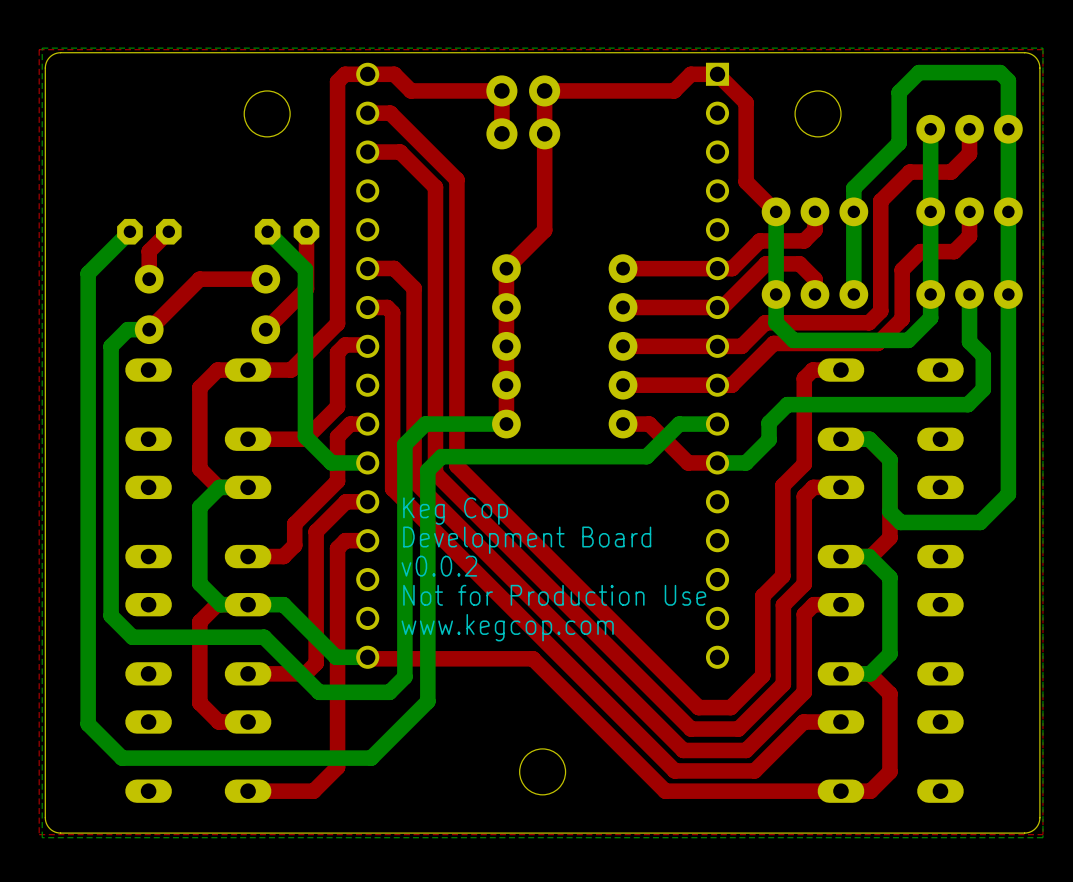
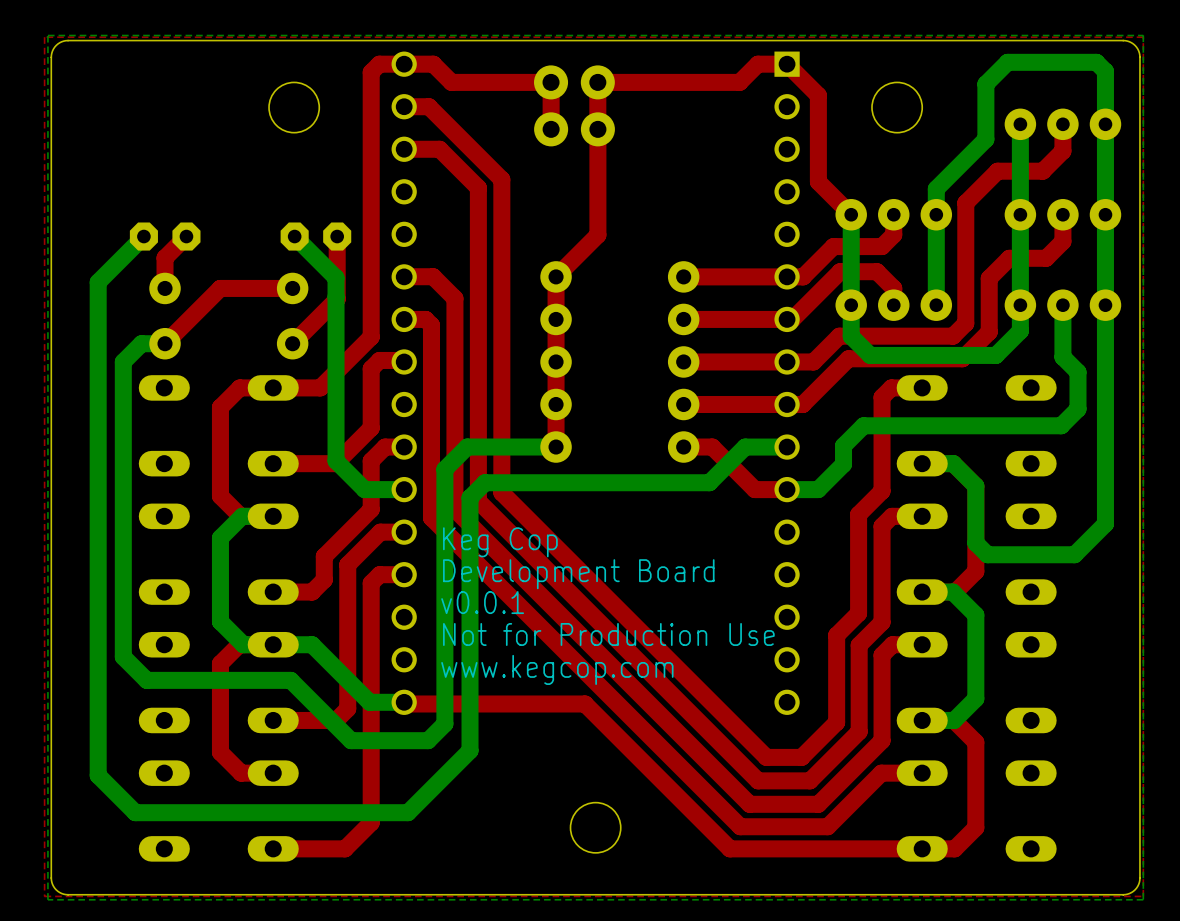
text: v0.0.2 (439, 566) -> v0.0.1 (482, 602)

